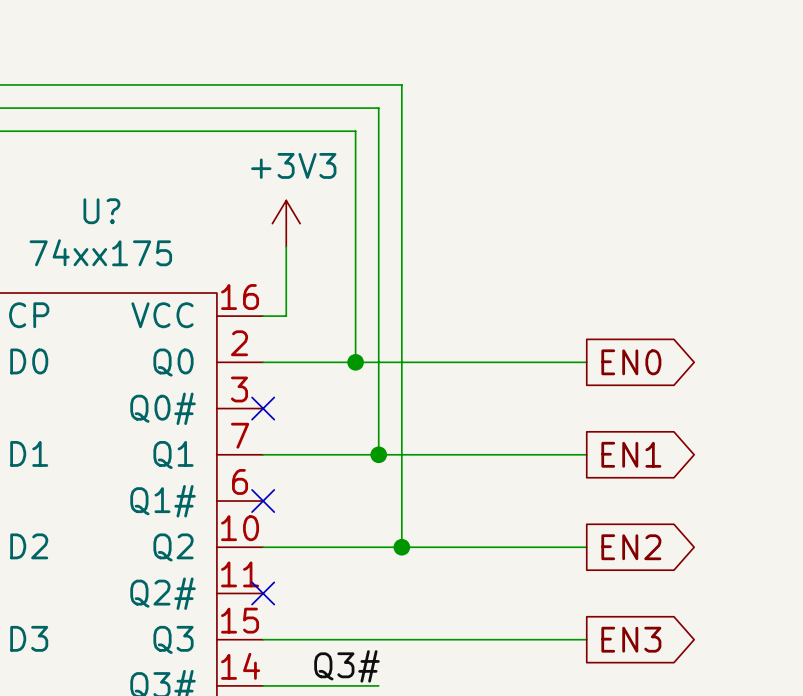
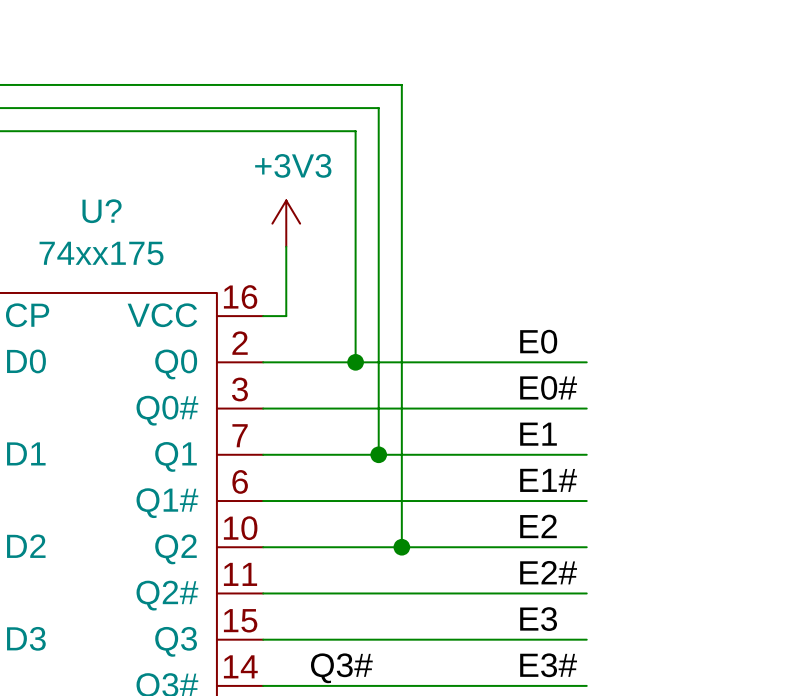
label: none -> E0 (538, 341)
global label: EN0 (631, 362) -> none
label: none -> E0# (548, 387)
wire: none -> (263, 408) (586, 408)
no-connect mark: (263, 408) -> none
label: none -> E1 (538, 434)
global label: EN1 (631, 454) -> none
label: none -> E1# (548, 480)
wire: none -> (263, 501) (586, 501)
no-connect mark: (263, 501) -> none
label: none -> E2 (538, 526)
global label: EN2 (631, 547) -> none
label: none -> E2# (548, 572)
wire: none -> (263, 593) (586, 593)
no-connect mark: (263, 593) -> none
label: none -> E3 (538, 619)
global label: EN3 (631, 639) -> none
label: none -> E3# (548, 665)
wire: none -> (378, 685) (586, 685)

